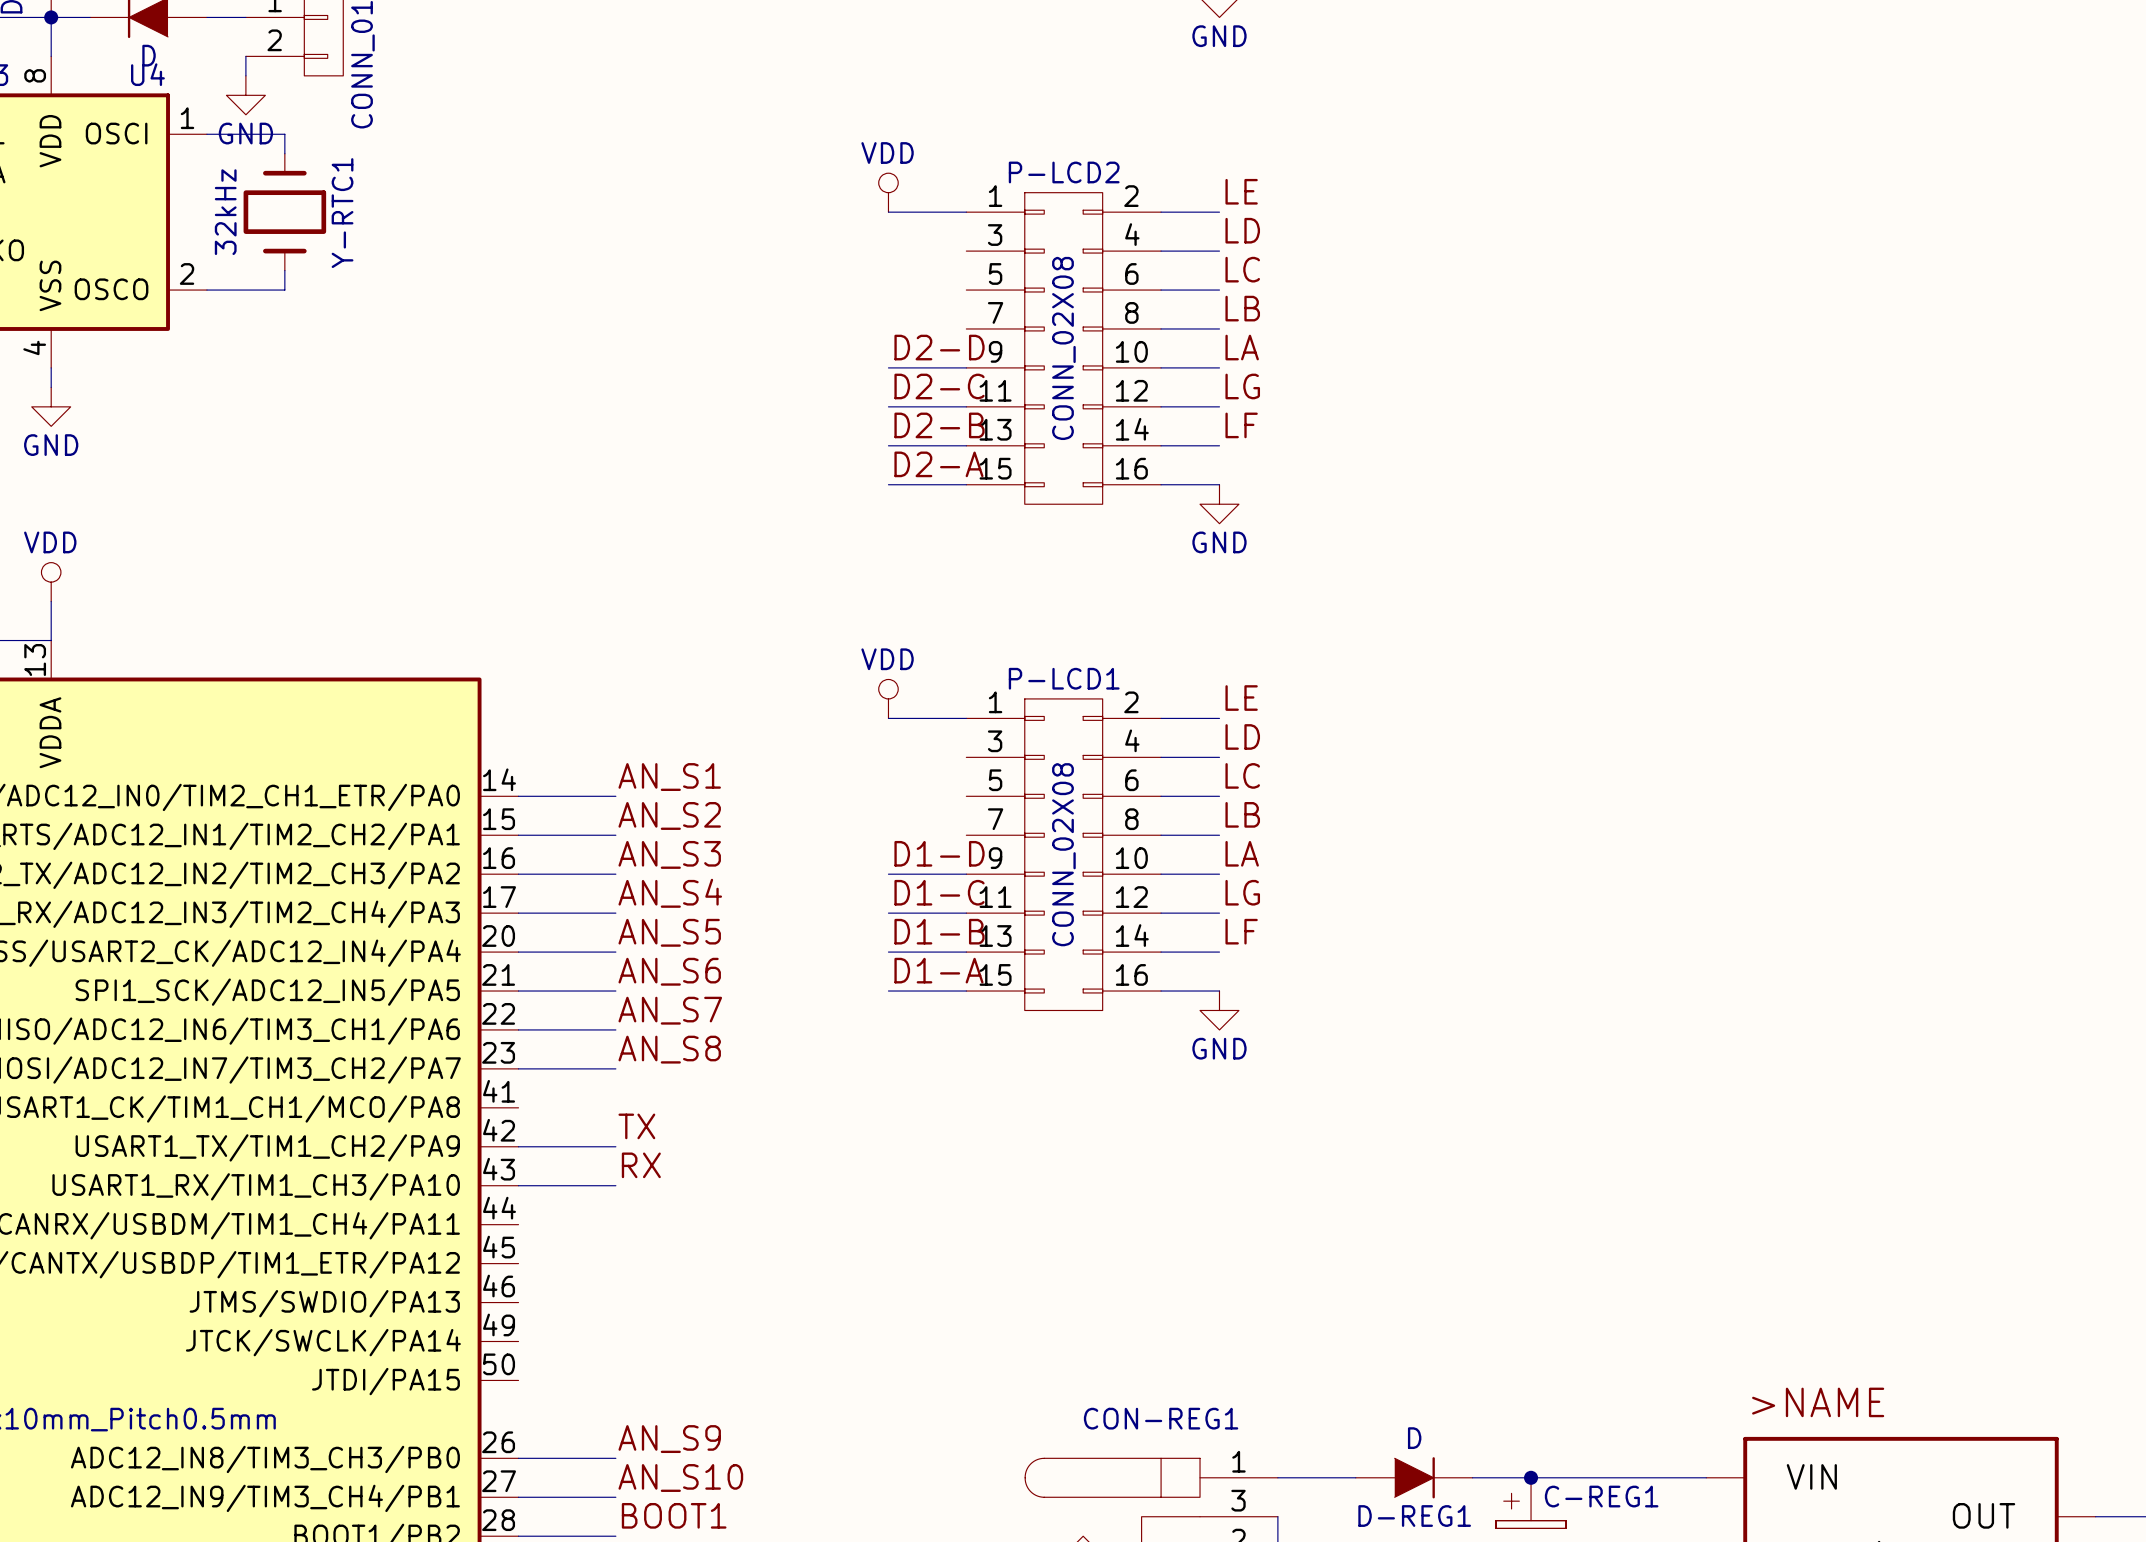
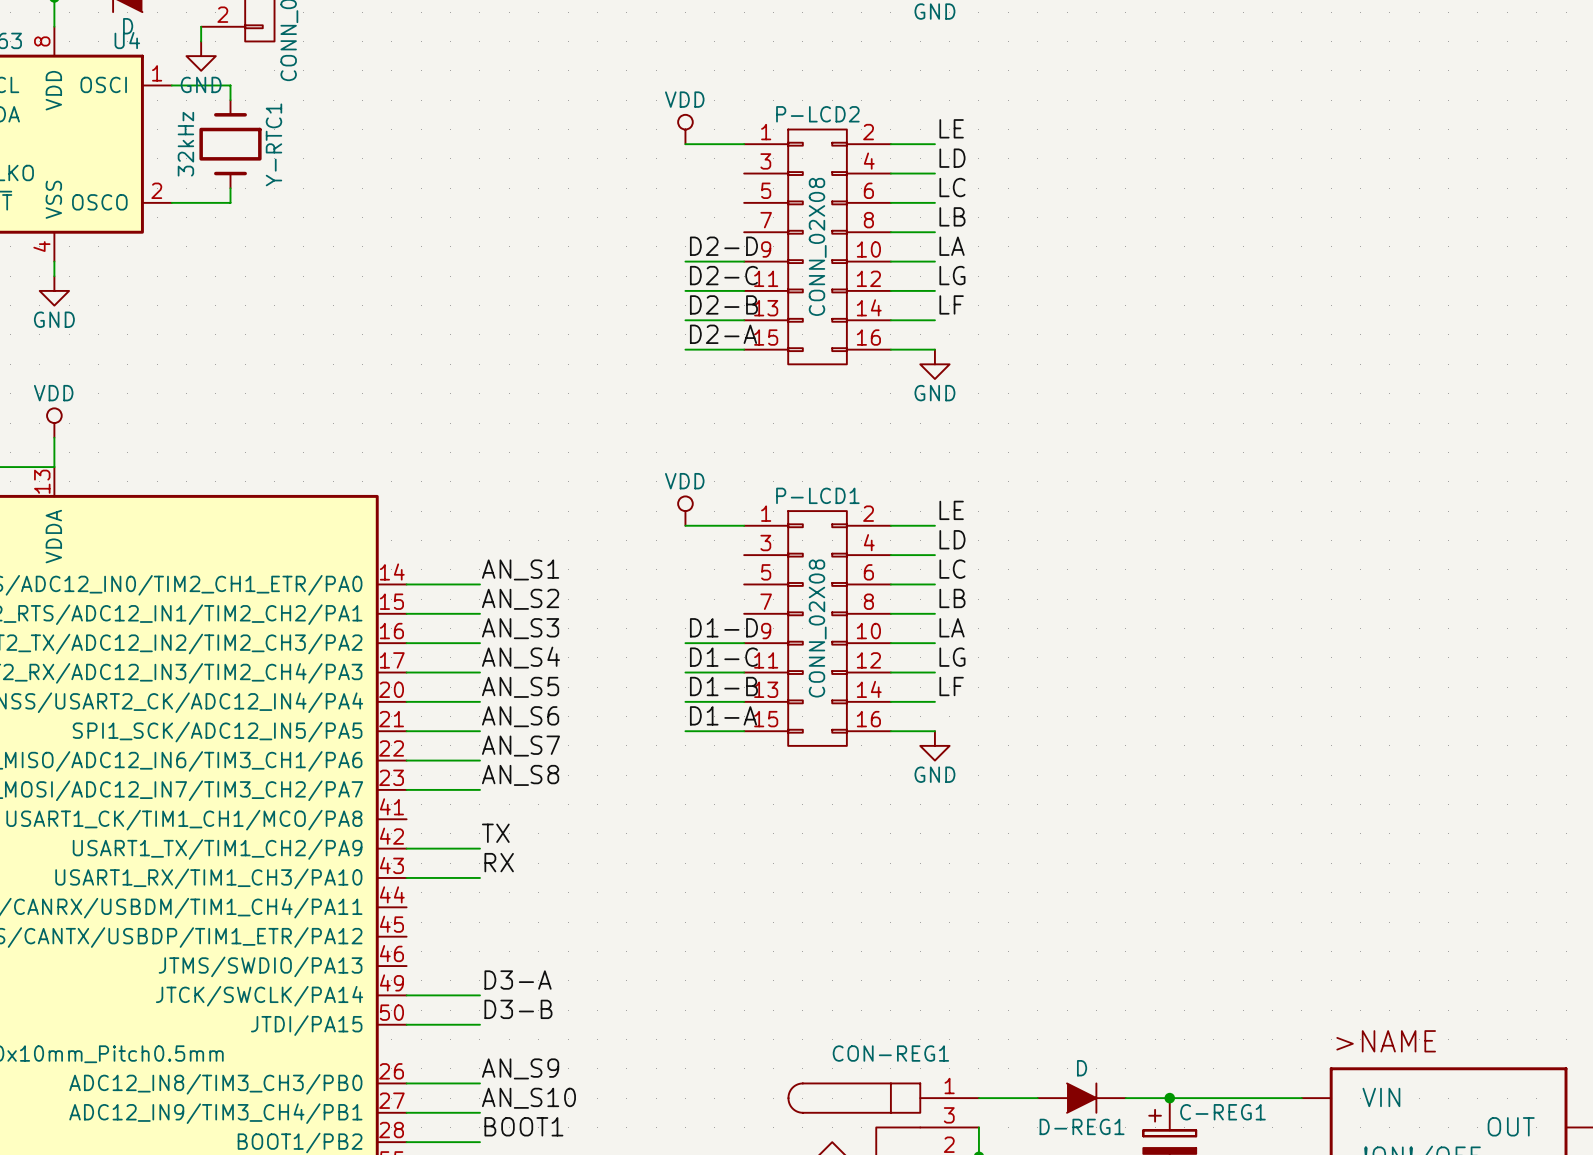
label: none -> D3-A (518, 980)
wire: none -> (406, 995) (479, 995)
label: none -> D3-B (518, 1009)
wire: none -> (406, 1024) (479, 1024)

